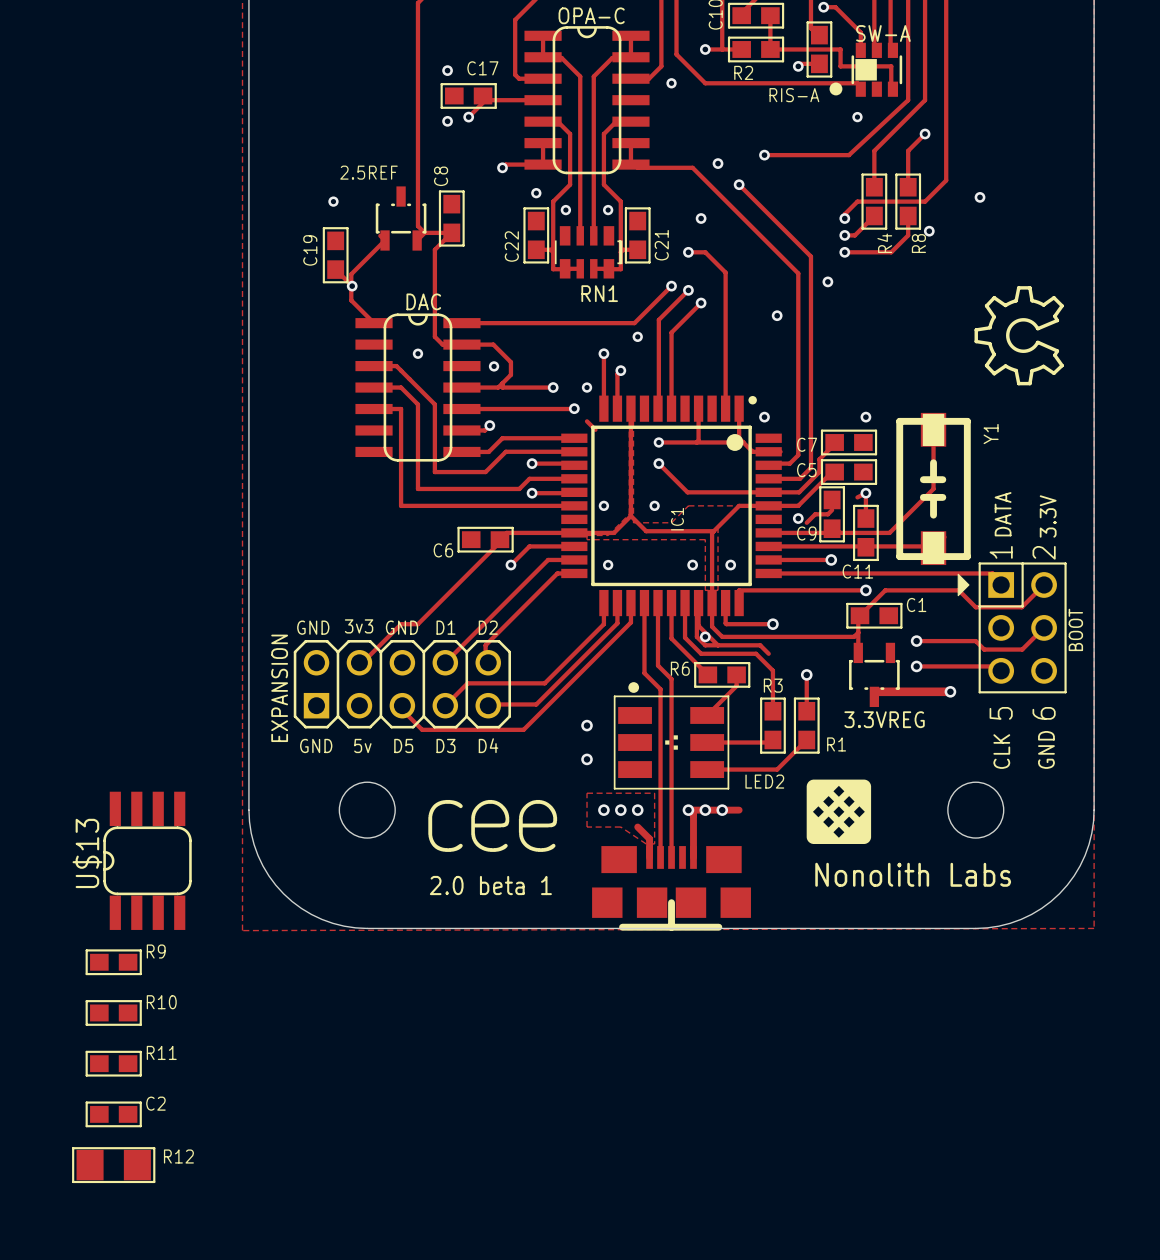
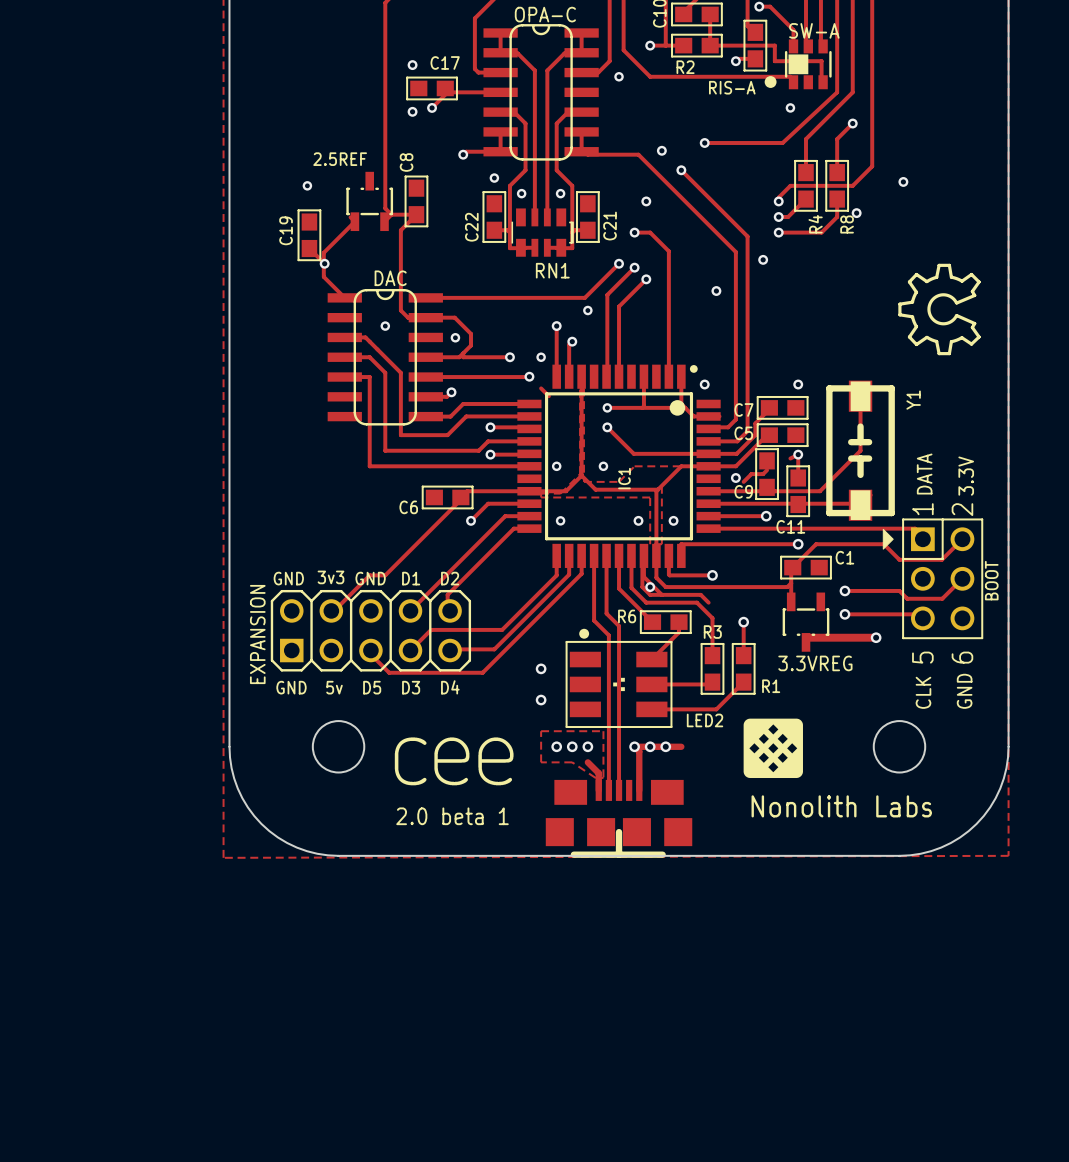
U$13: (147, 860) -> none
R9: (113, 962) -> none
R10: (113, 1012) -> none
R11: (113, 1063) -> none
C2: (113, 1114) -> none
R12: (113, 1165) -> none

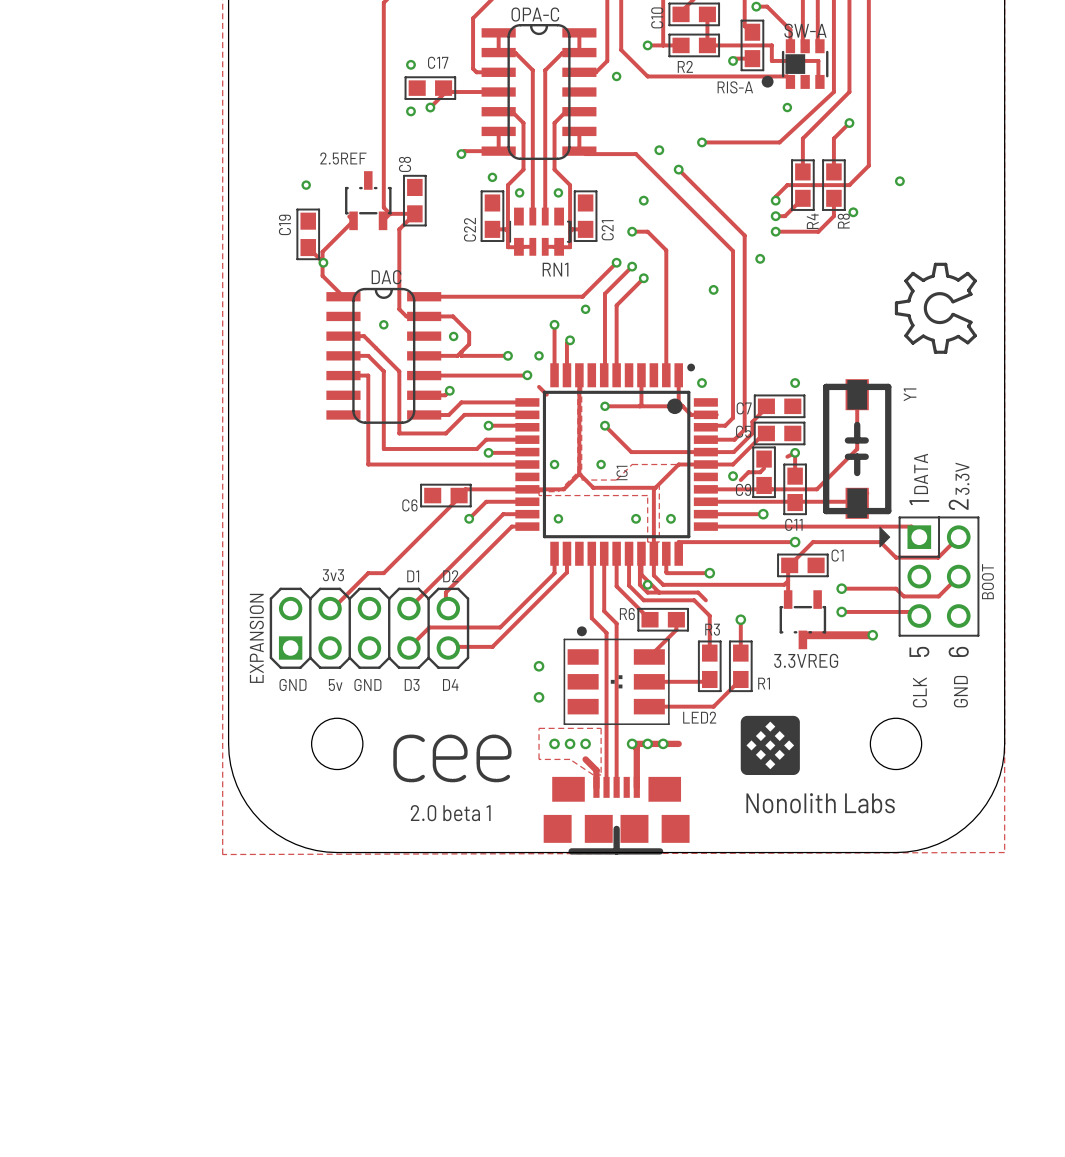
track: (581, 555) (581, 573) (482, 672) (389, 672) (369, 653) (370, 650) -> none
text: GND (288, 578) -> none
text: GND (370, 578) -> none
text: D5 (372, 687) -> GND (367, 684)

